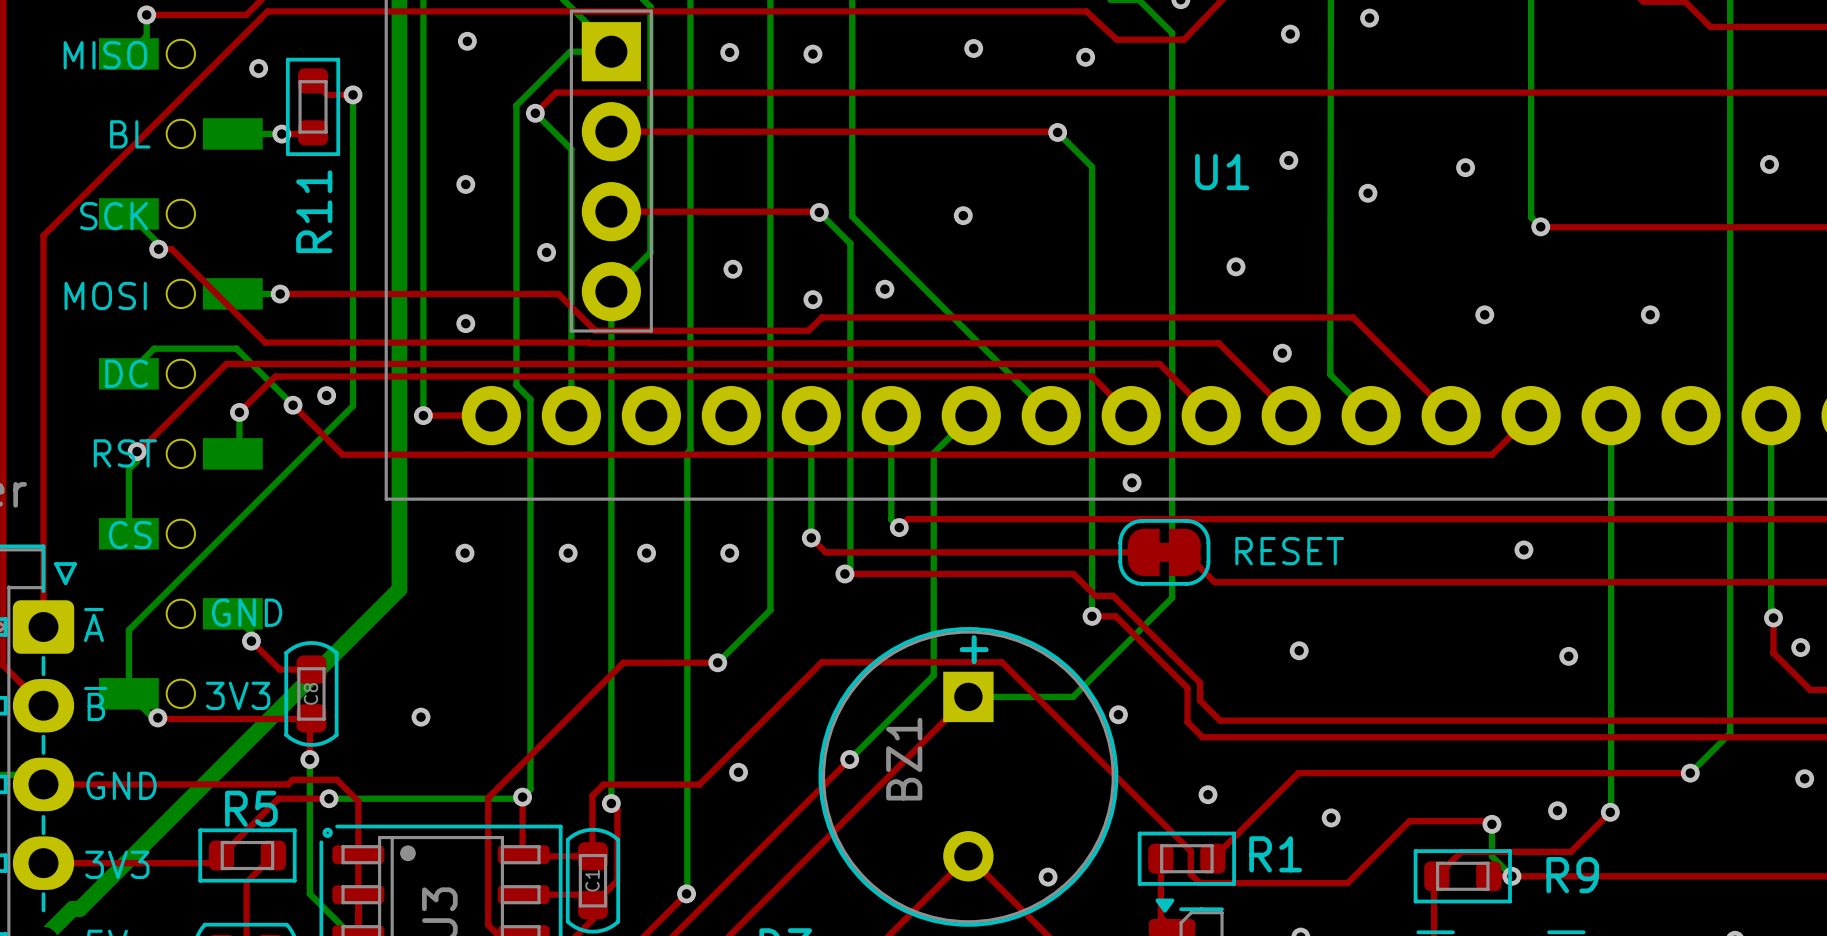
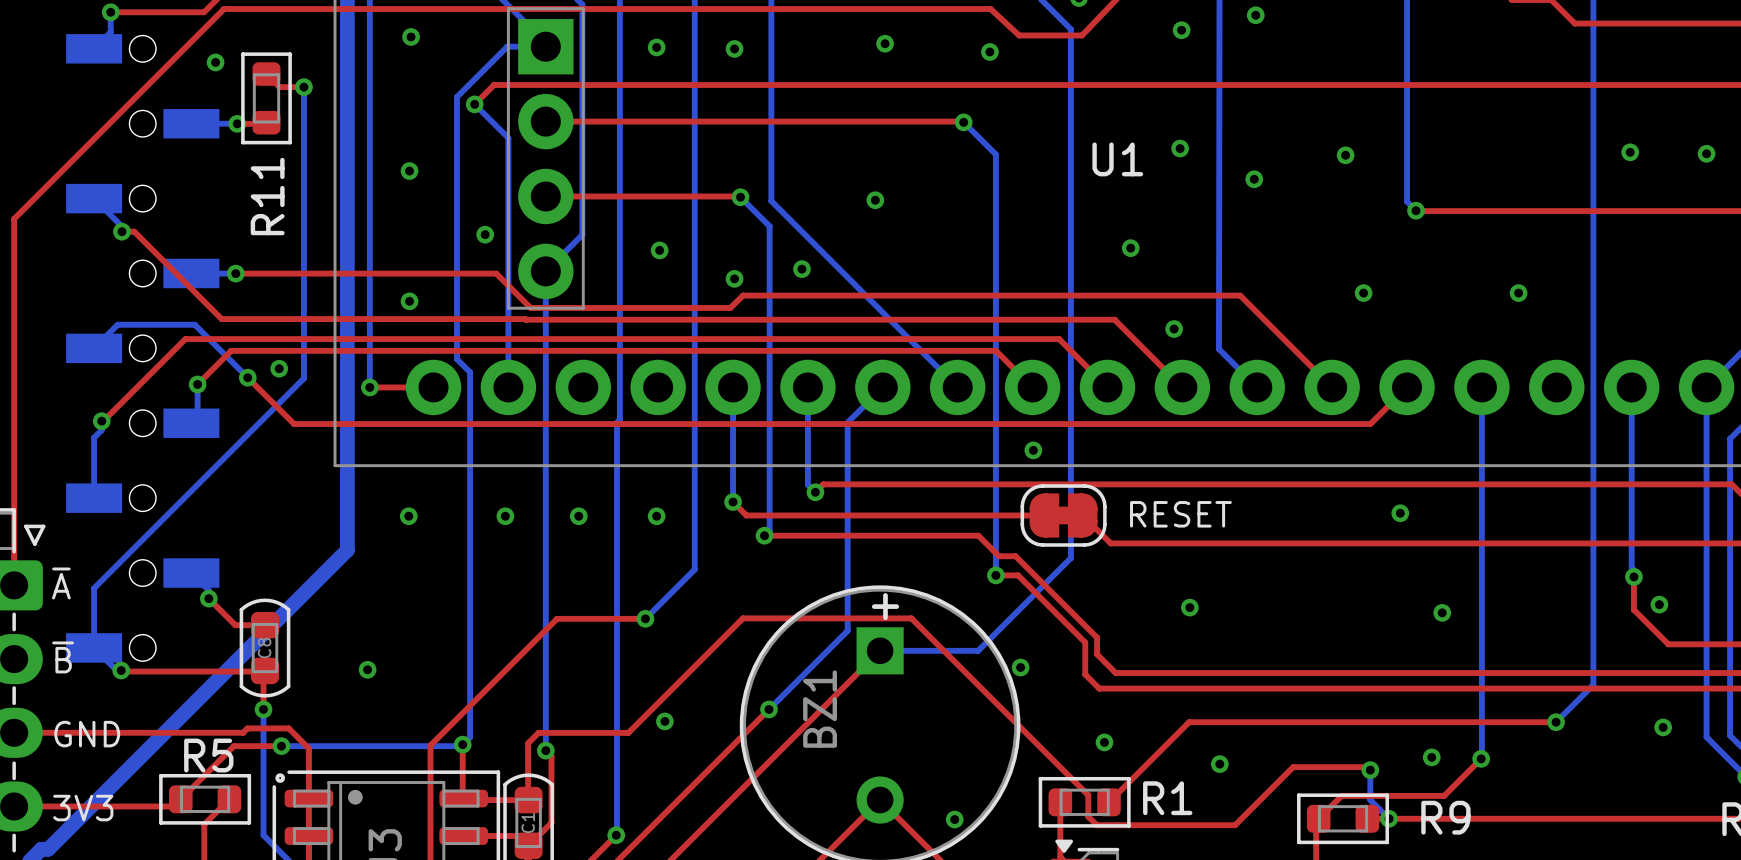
text: MISO (105, 55) -> none
text: BL (130, 134) -> none
text: SCK (114, 216) -> none
text: MOSI (105, 295) -> none
text: DC (126, 373) -> none
text: RST (125, 453) -> none
text: CS (130, 535) -> none
text: GND (247, 612) -> none
text: 3V3 (238, 695) -> none

